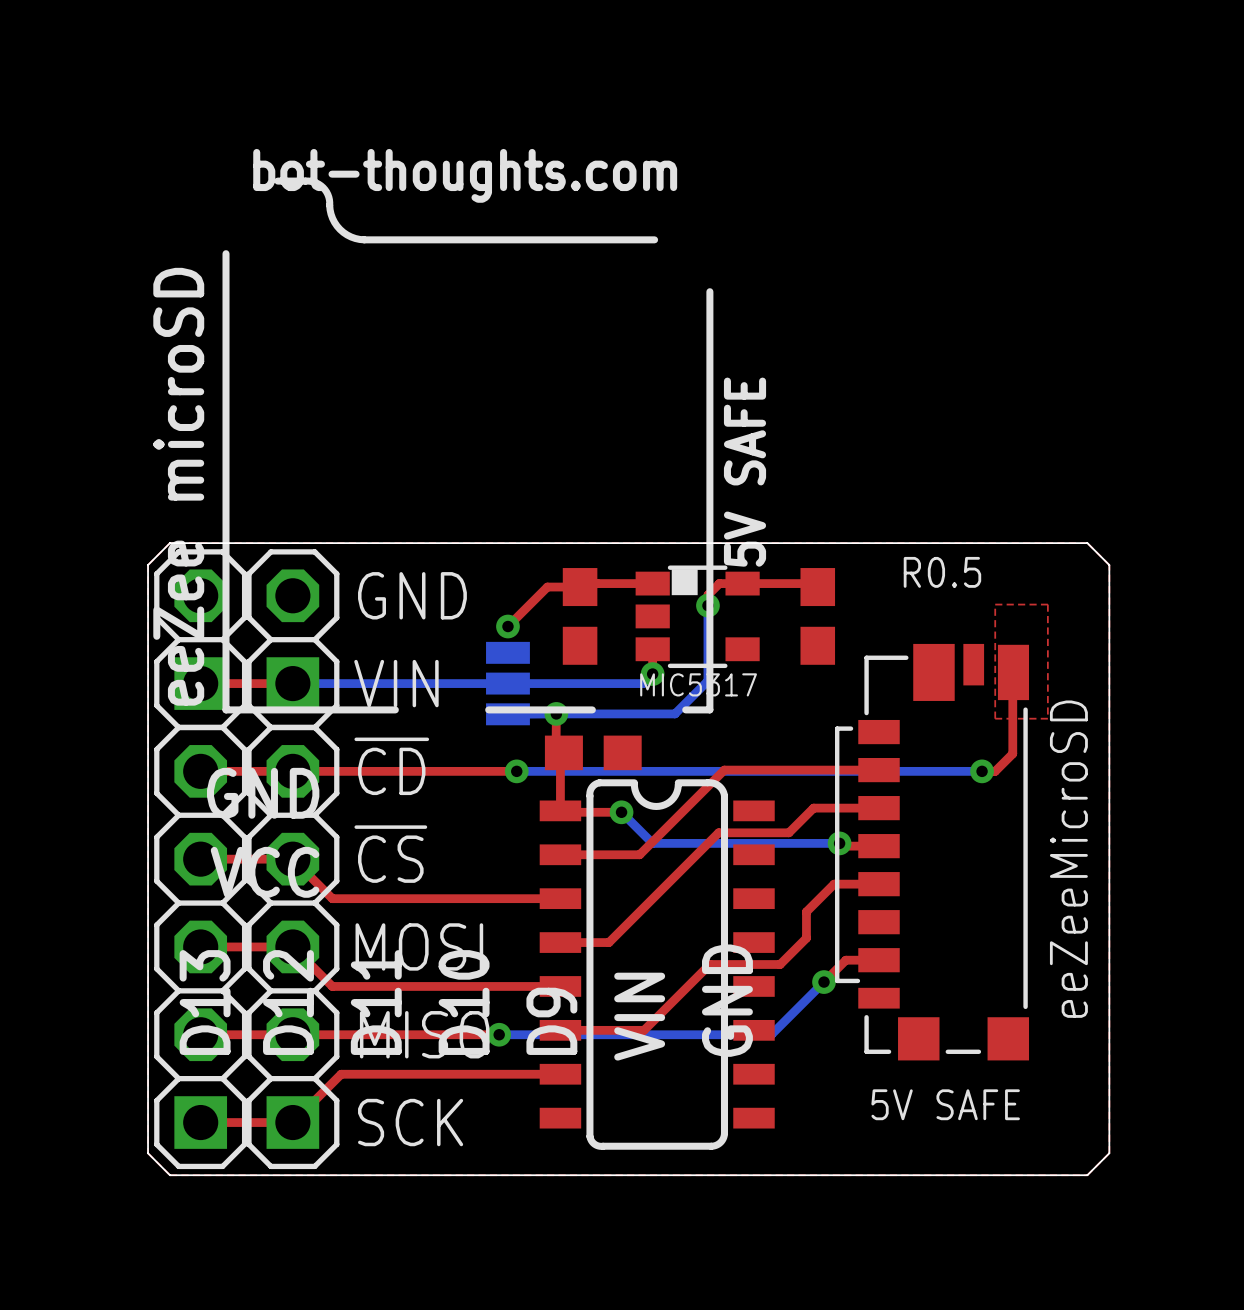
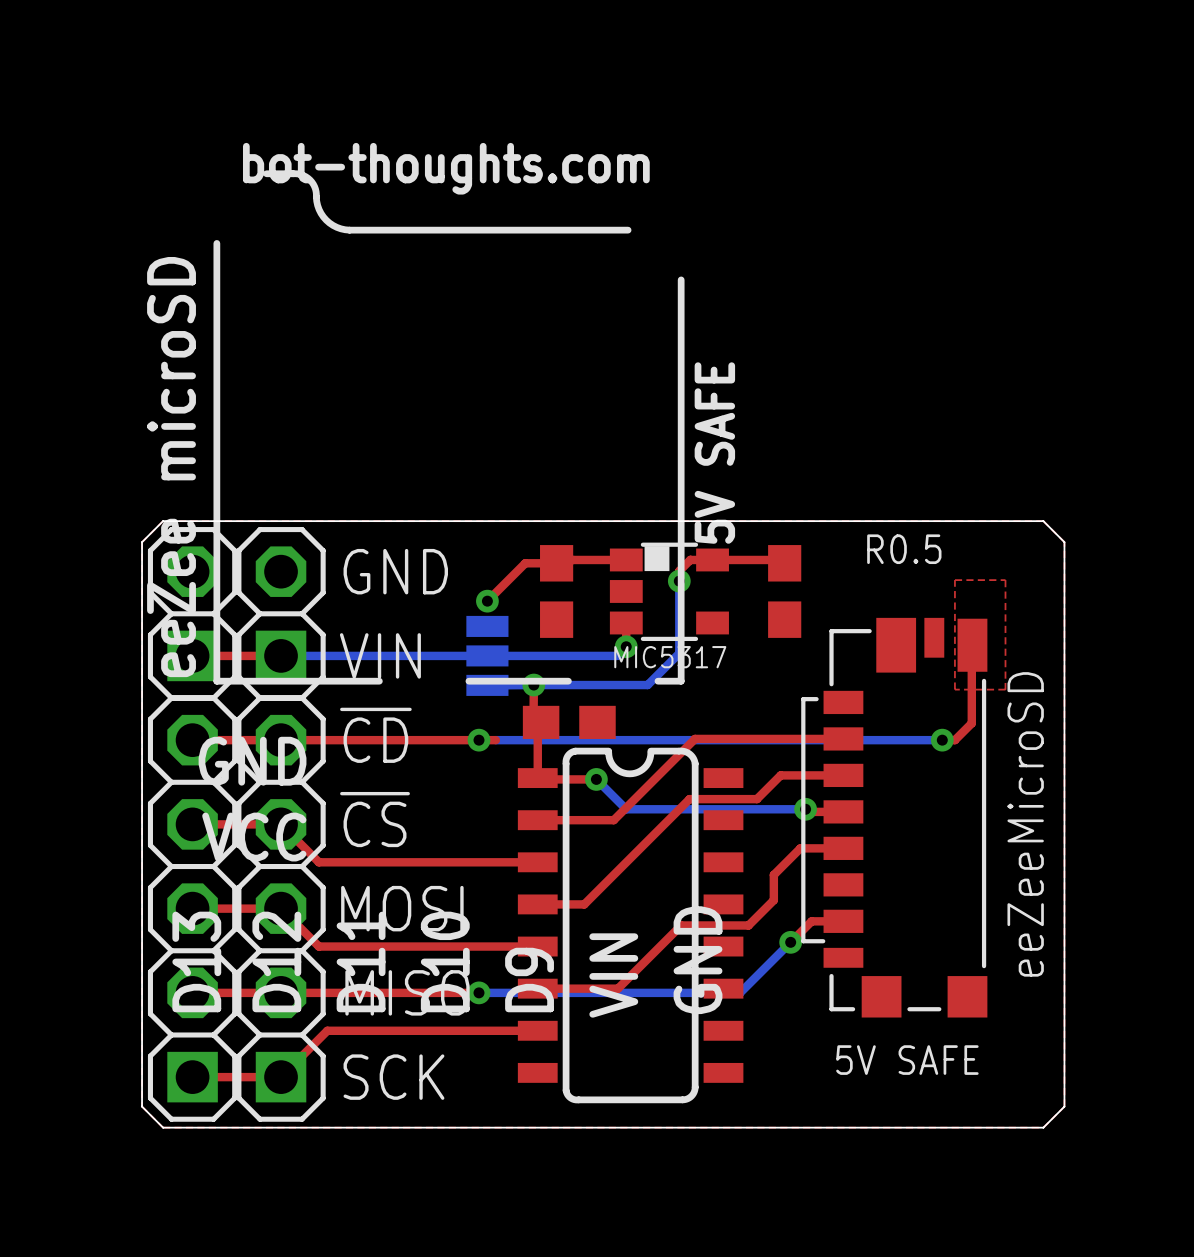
via position: (516, 771) -> (478, 740)

